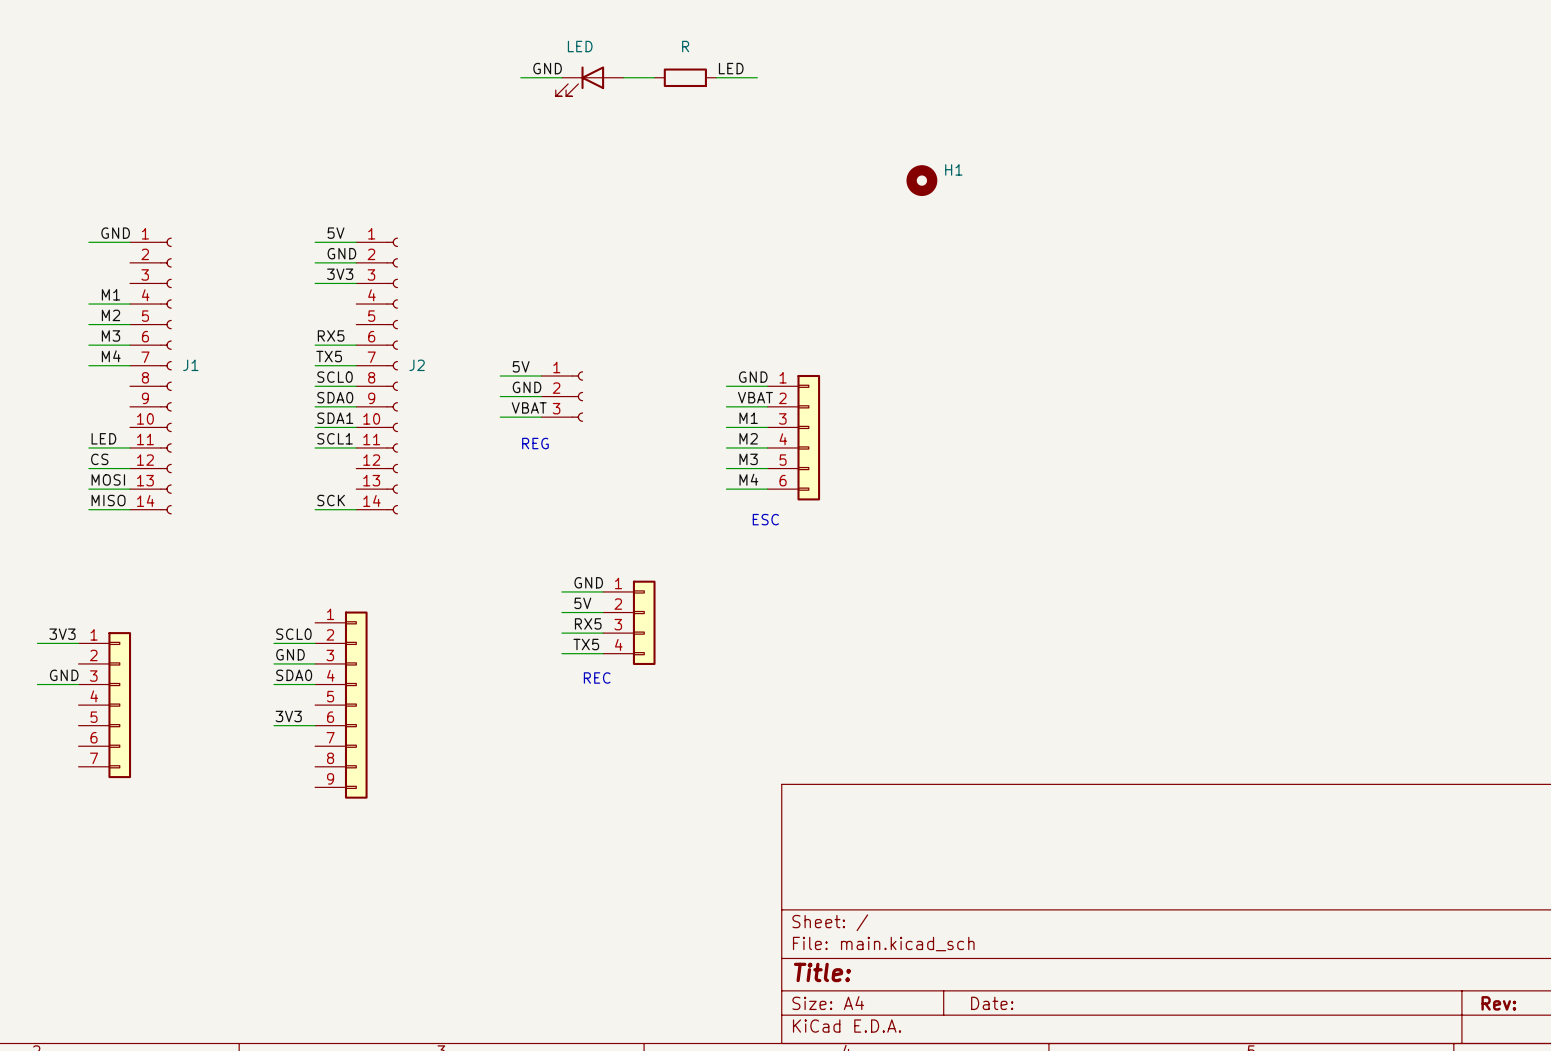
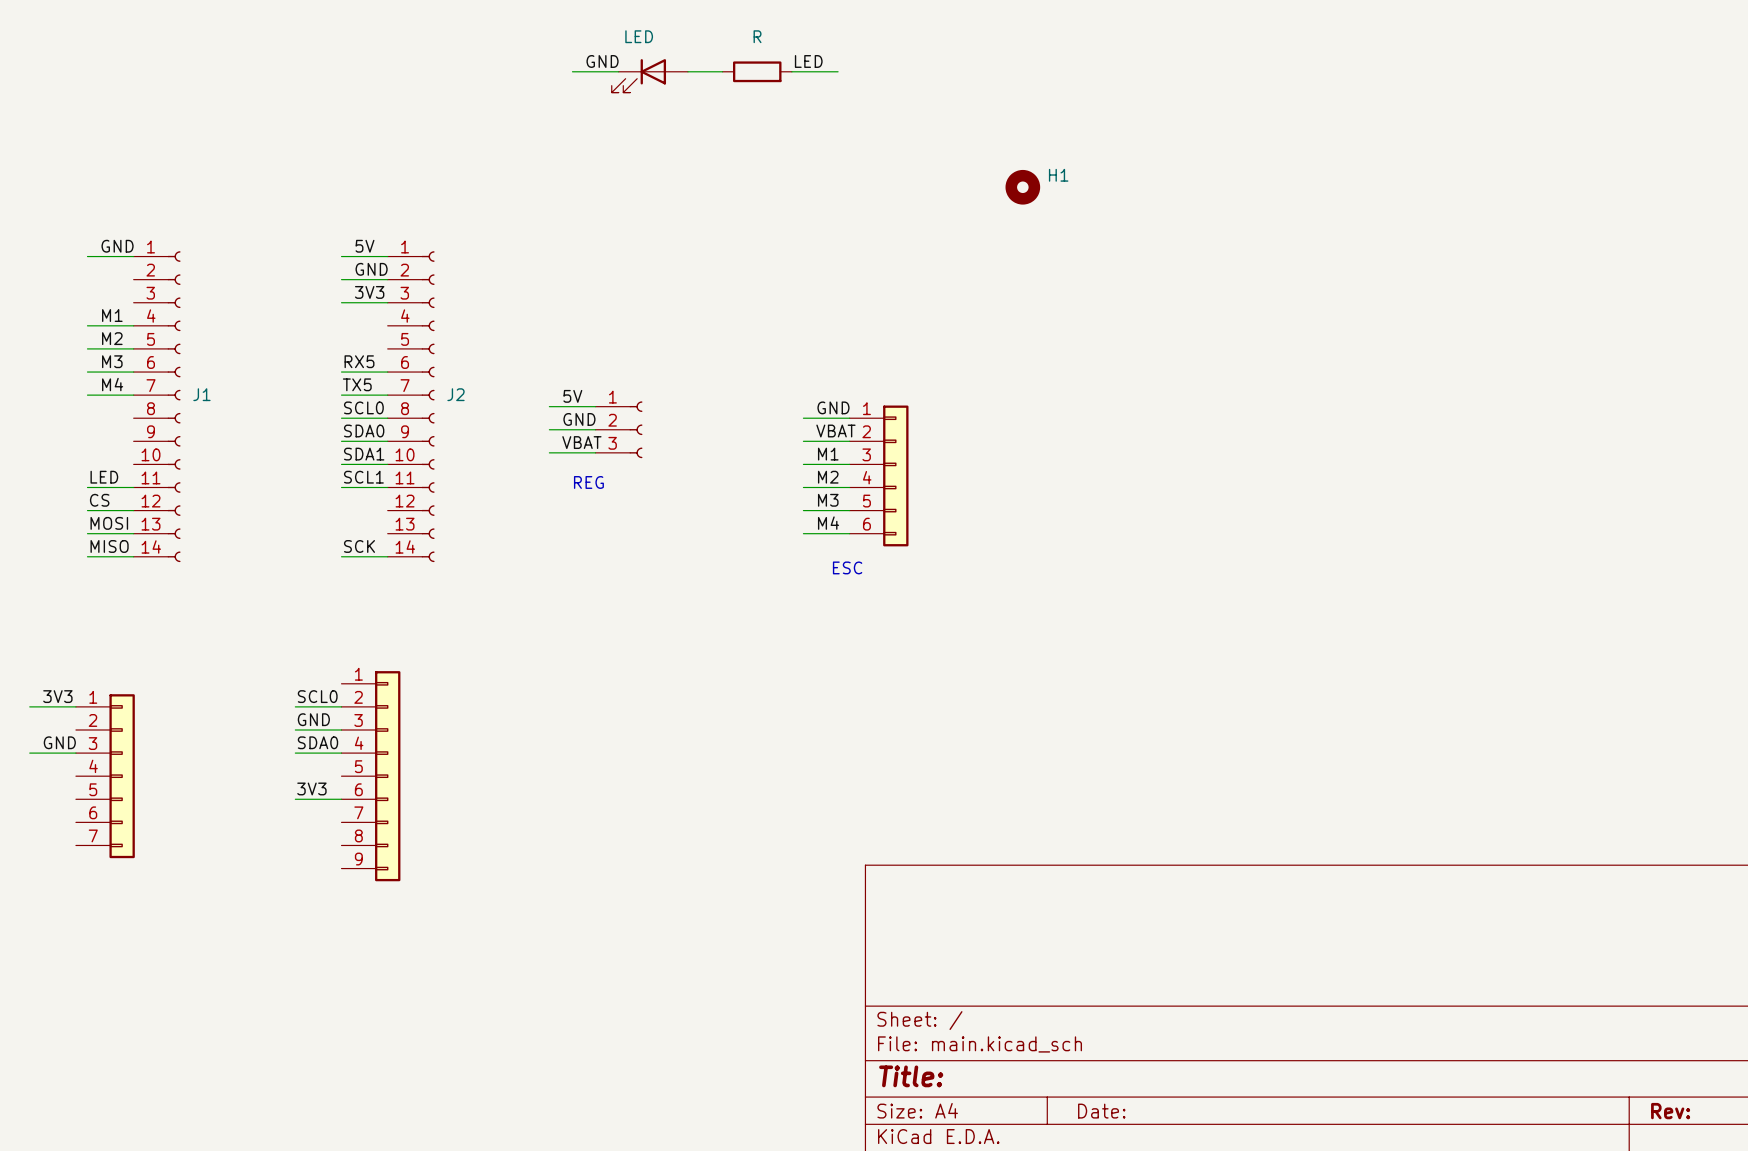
label: GND (588, 582) -> none
wire: (561, 591) (603, 591) -> none
label: 5V (582, 603) -> none
wire: (561, 612) (603, 612) -> none
part: (629, 622) -> none
label: RX5 (588, 623) -> none
wire: (561, 633) (603, 633) -> none
label: TX5 (586, 644) -> none
wire: (561, 653) (603, 653) -> none
text: REC (597, 678) -> none

